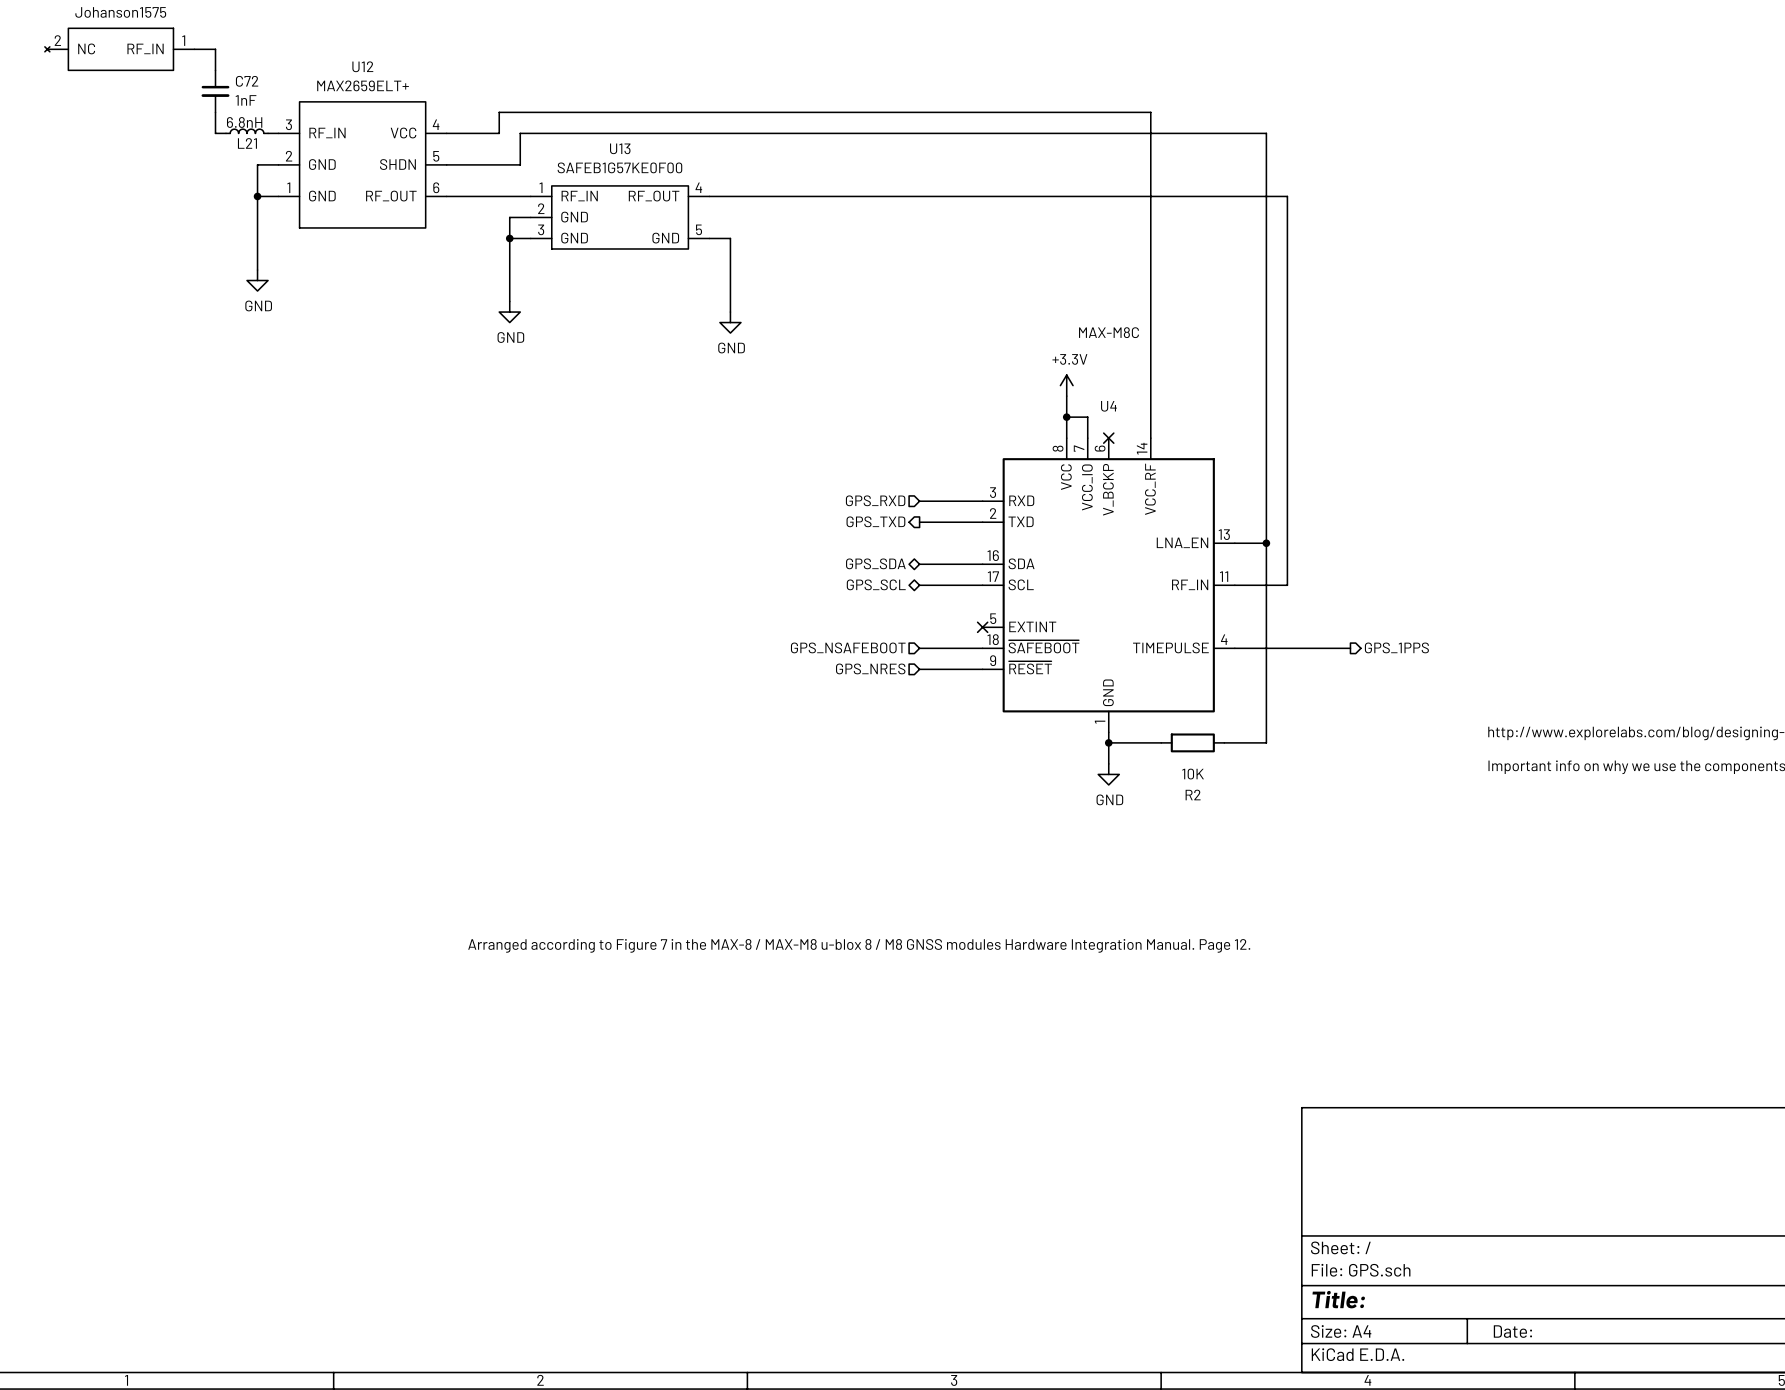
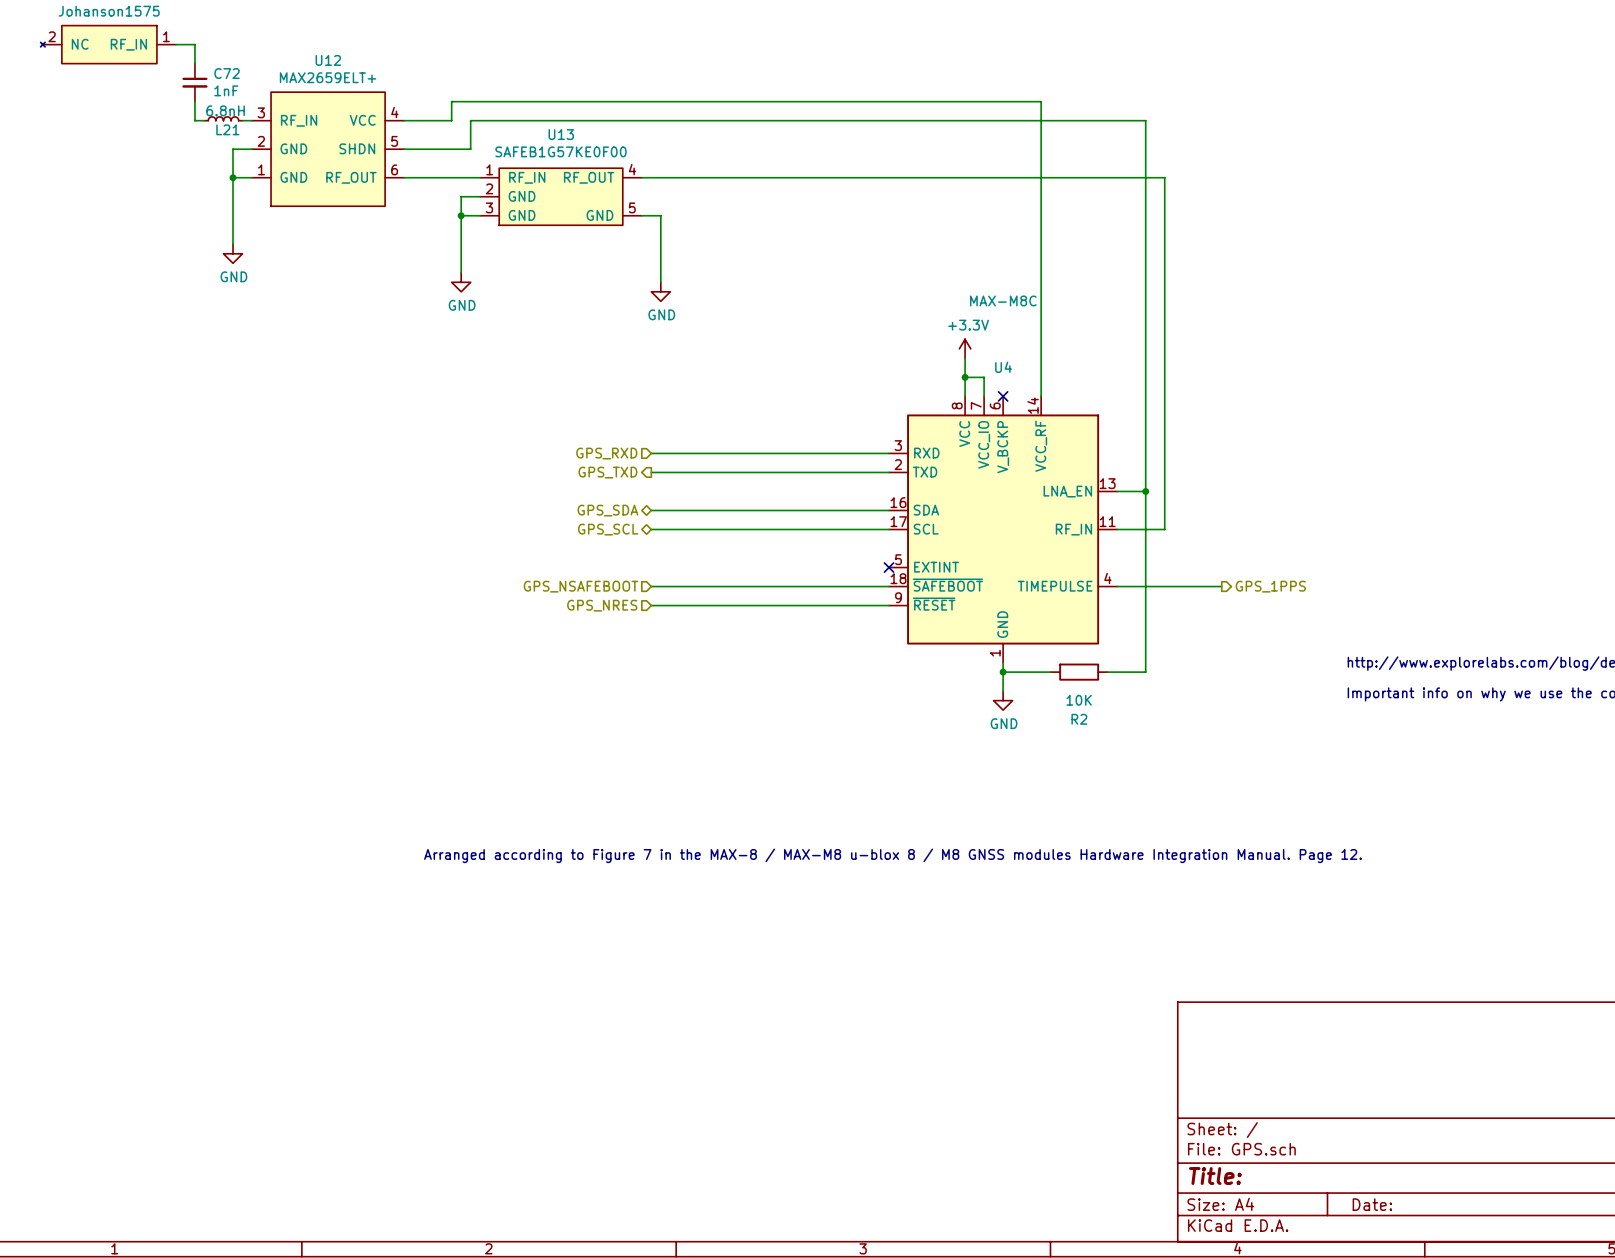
hierarchical label position: GPS_RXD (875, 500) -> GPS_RXD (606, 453)
wire: none -> (651, 453) (831, 453)
hierarchical label position: GPS_TXD (875, 521) -> GPS_TXD (607, 472)
wire: none -> (651, 472) (831, 472)
hierarchical label position: GPS_SDA (875, 563) -> GPS_SDA (607, 510)
wire: none -> (651, 510) (831, 510)
hierarchical label position: GPS_SCL (876, 584) -> GPS_SCL (608, 529)
wire: none -> (651, 529) (831, 529)
hierarchical label position: GPS_NSAFEBOOT (848, 647) -> GPS_NSAFEBOOT (581, 586)
wire: none -> (651, 586) (831, 586)
hierarchical label position: GPS_NRES (870, 668) -> GPS_NRES (602, 605)
wire: none -> (651, 605) (831, 605)

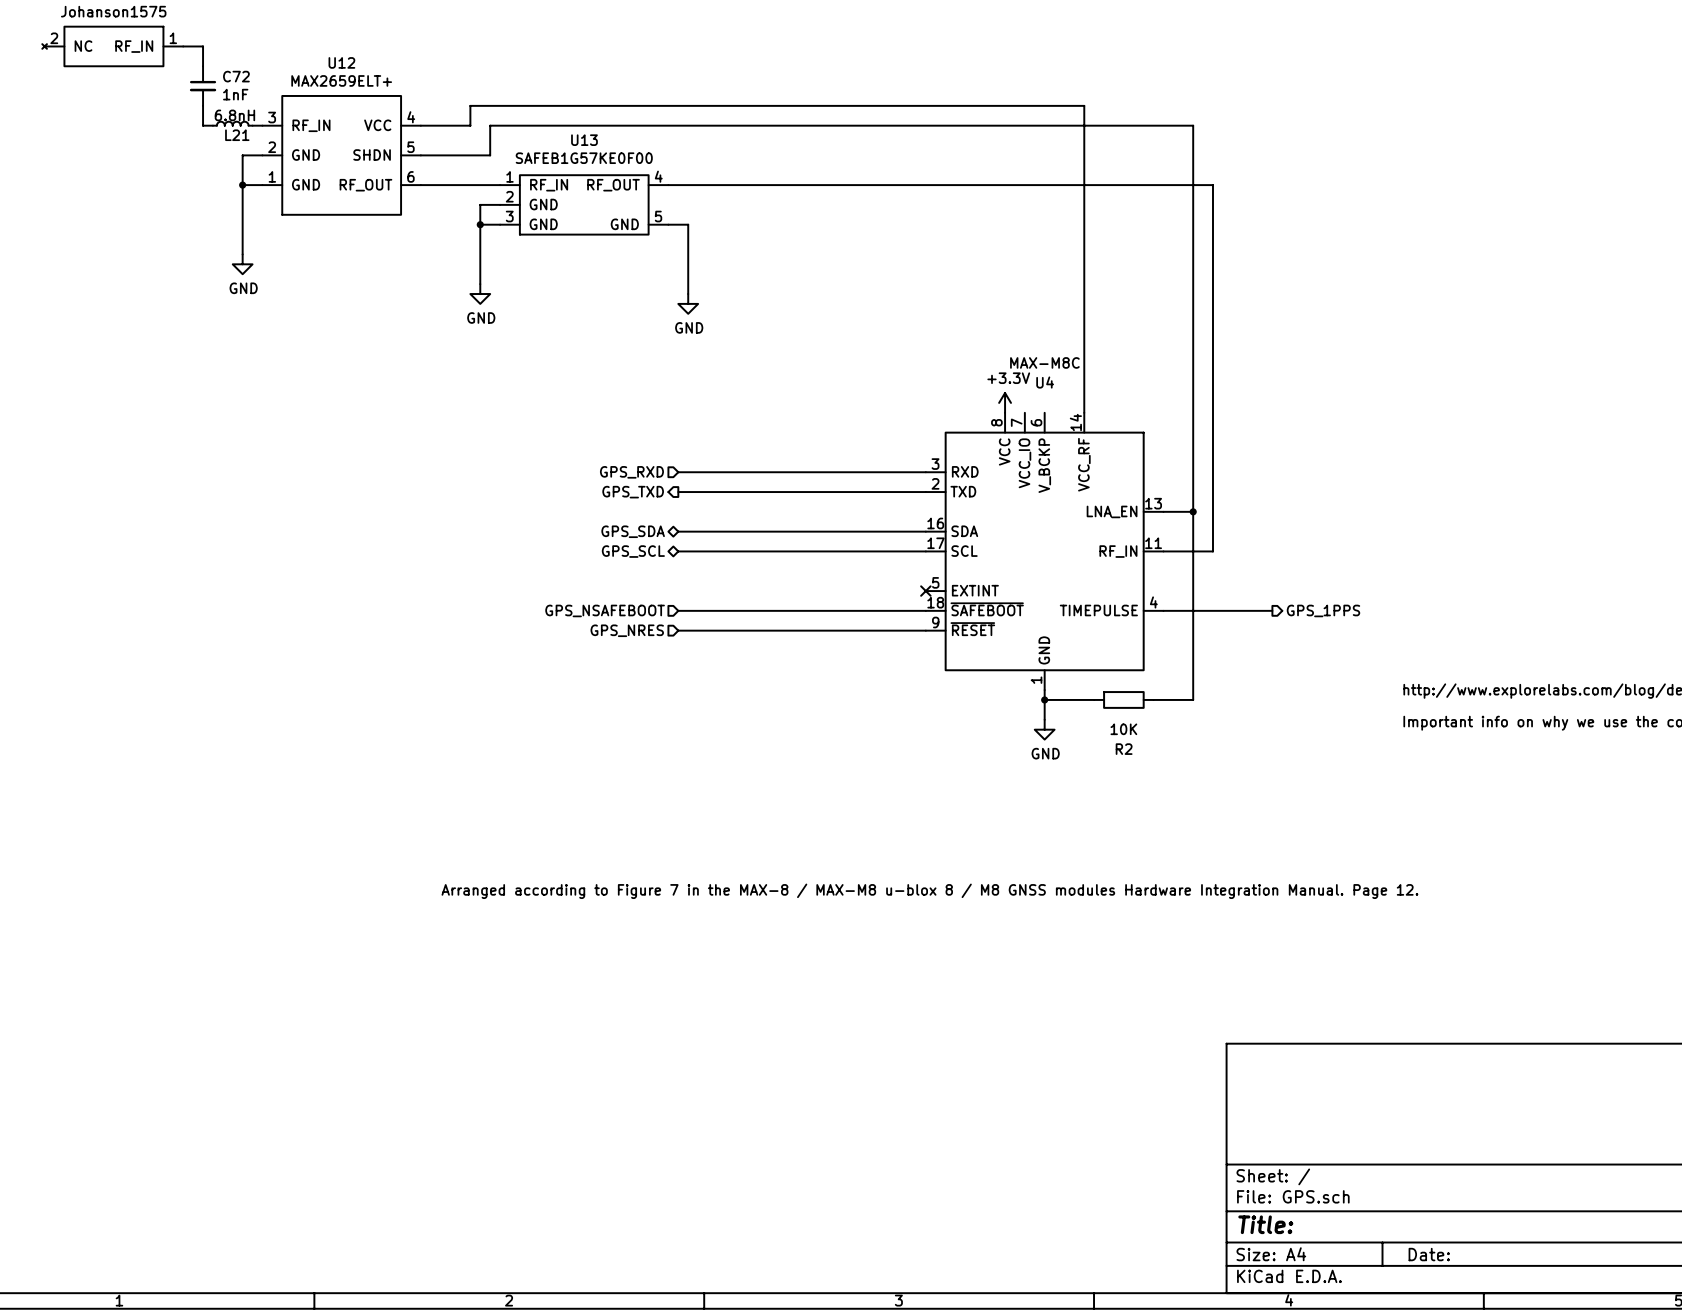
U4 value position: MAX-M8C (1003, 300) -> MAX-M8C (1044, 362)
power symbol position: +3.3V (965, 348) -> +3.3V (1005, 402)
wire: (965, 377) (984, 377) (984, 396) -> none
junction: (965, 377) -> none
no-connect mark: (1003, 396) -> none

